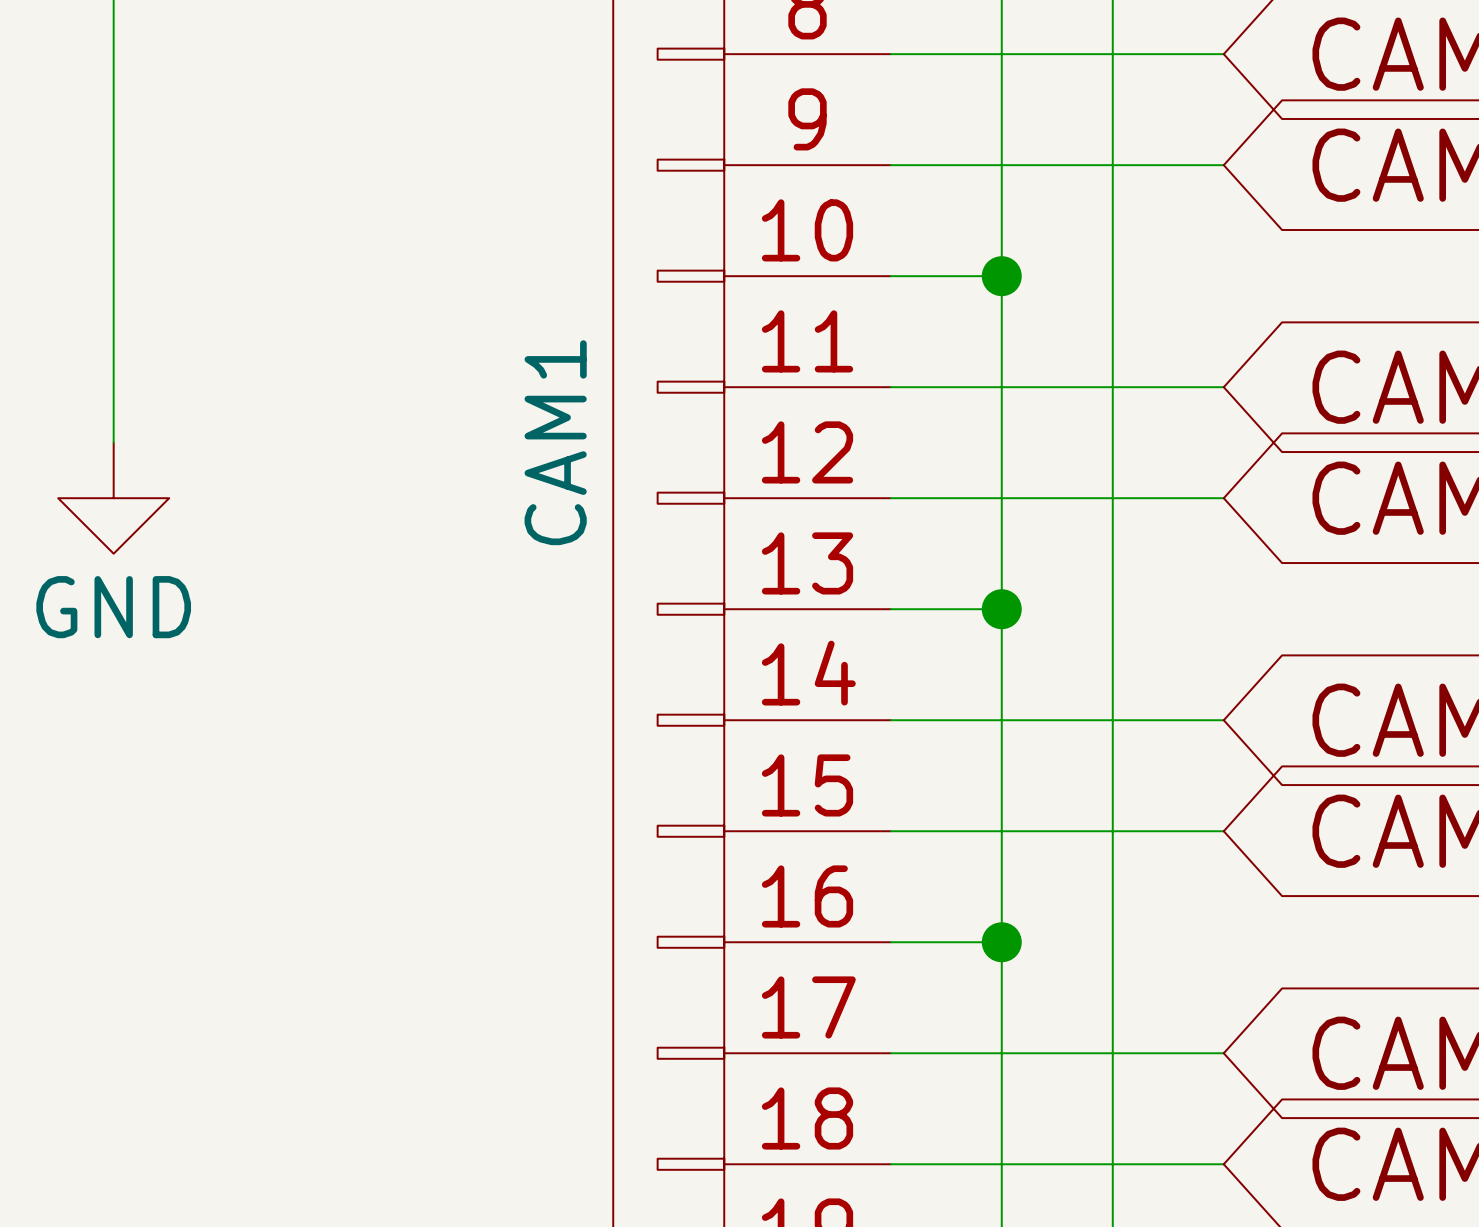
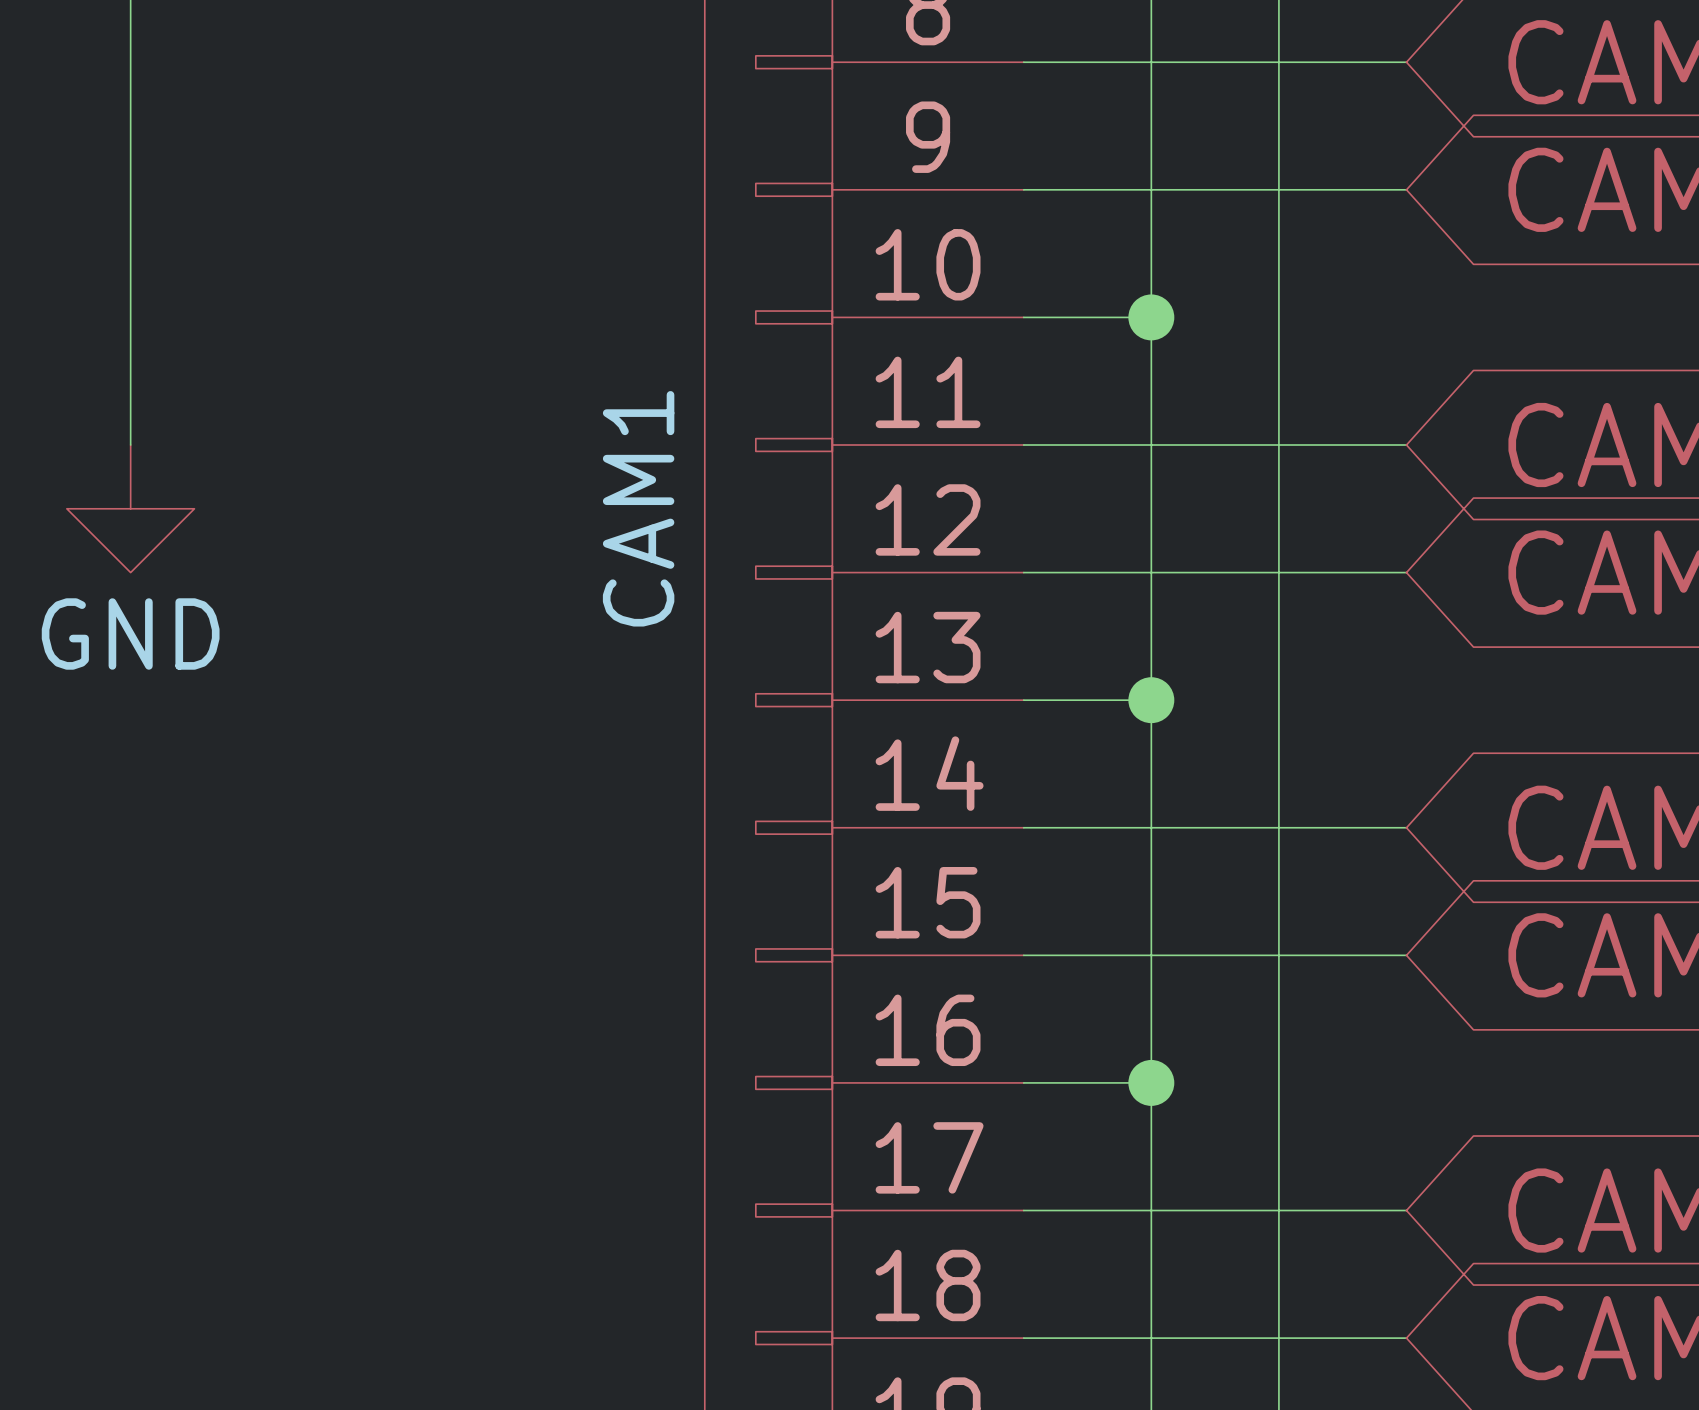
power symbol position: GND (113, 498) -> GND (130, 508)

